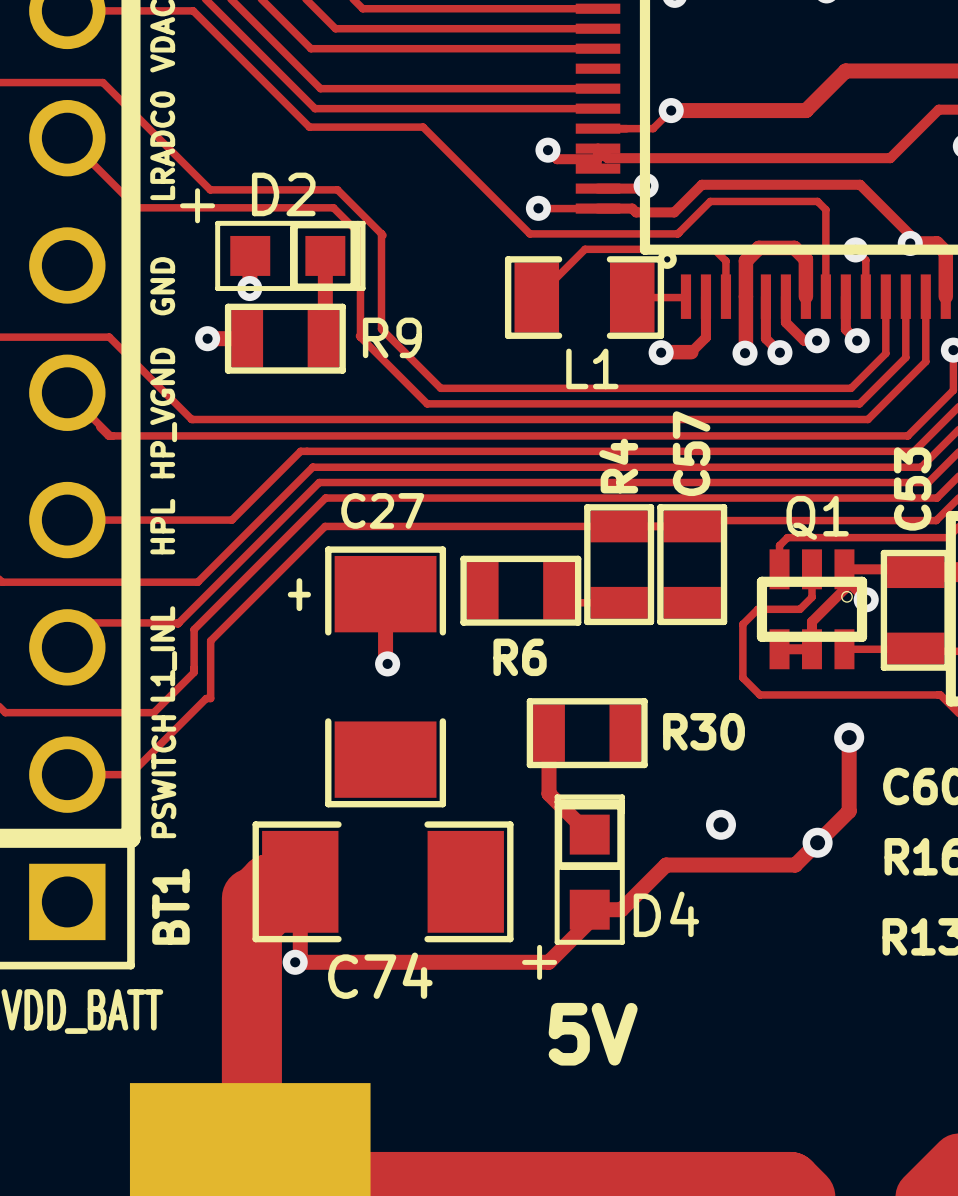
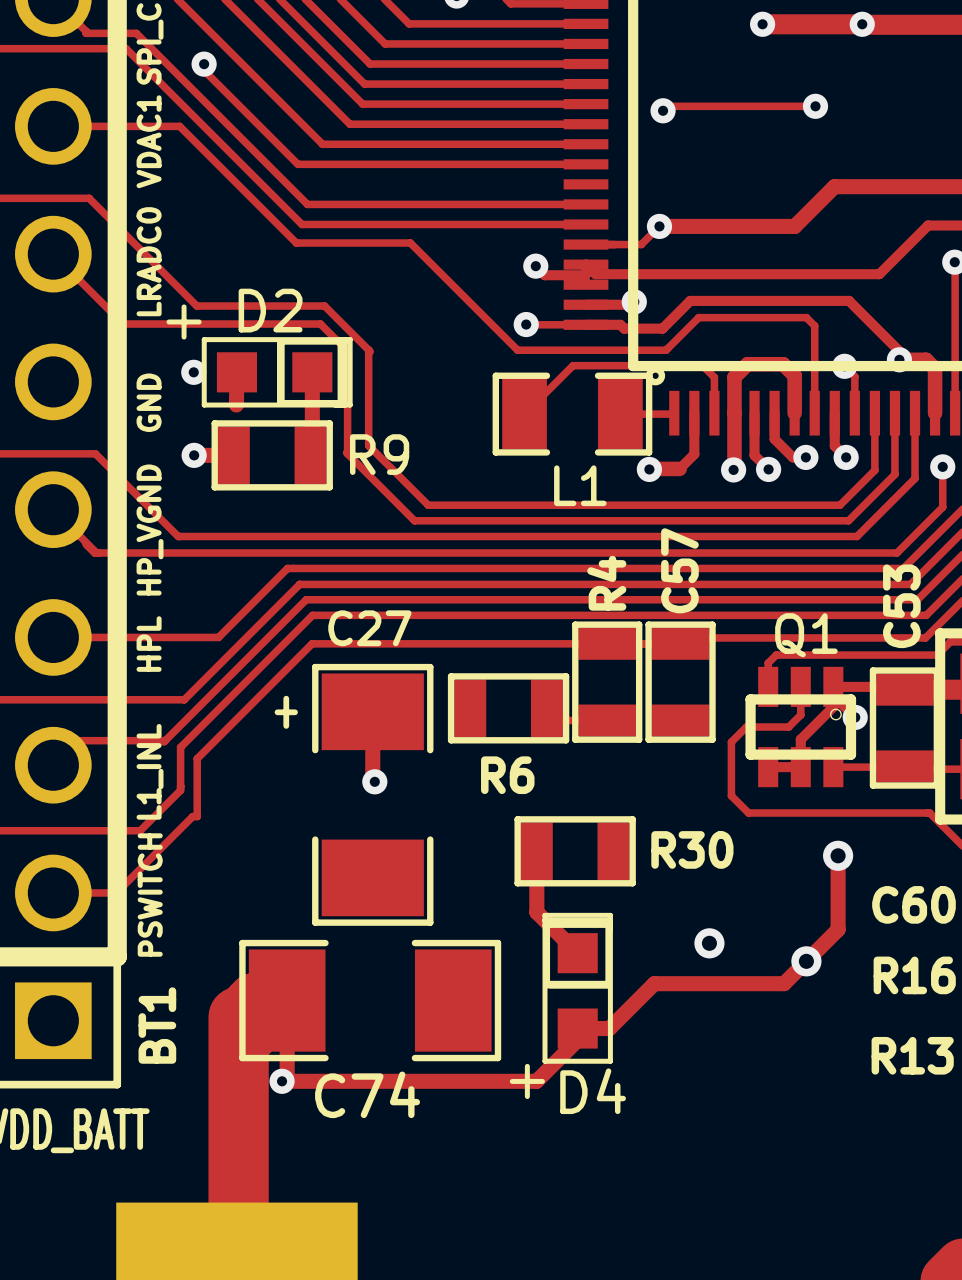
via position: (249, 288) -> (193, 372)
D4 name position: D4 (666, 914) -> D4 (593, 1091)
text: 5V (593, 1034) -> none

